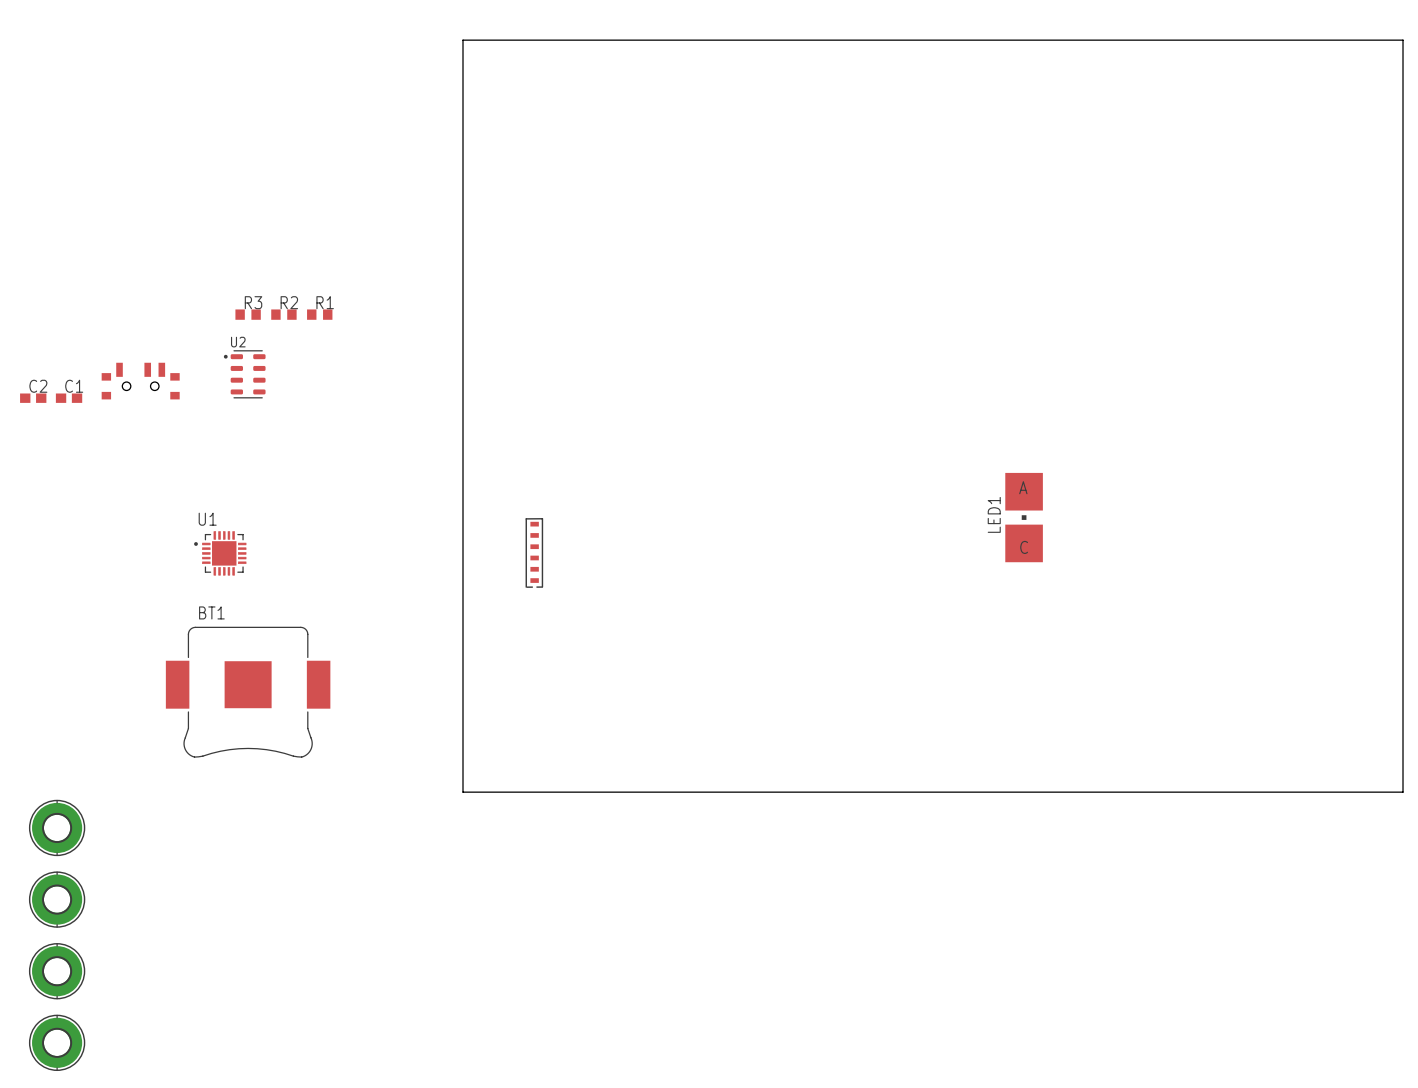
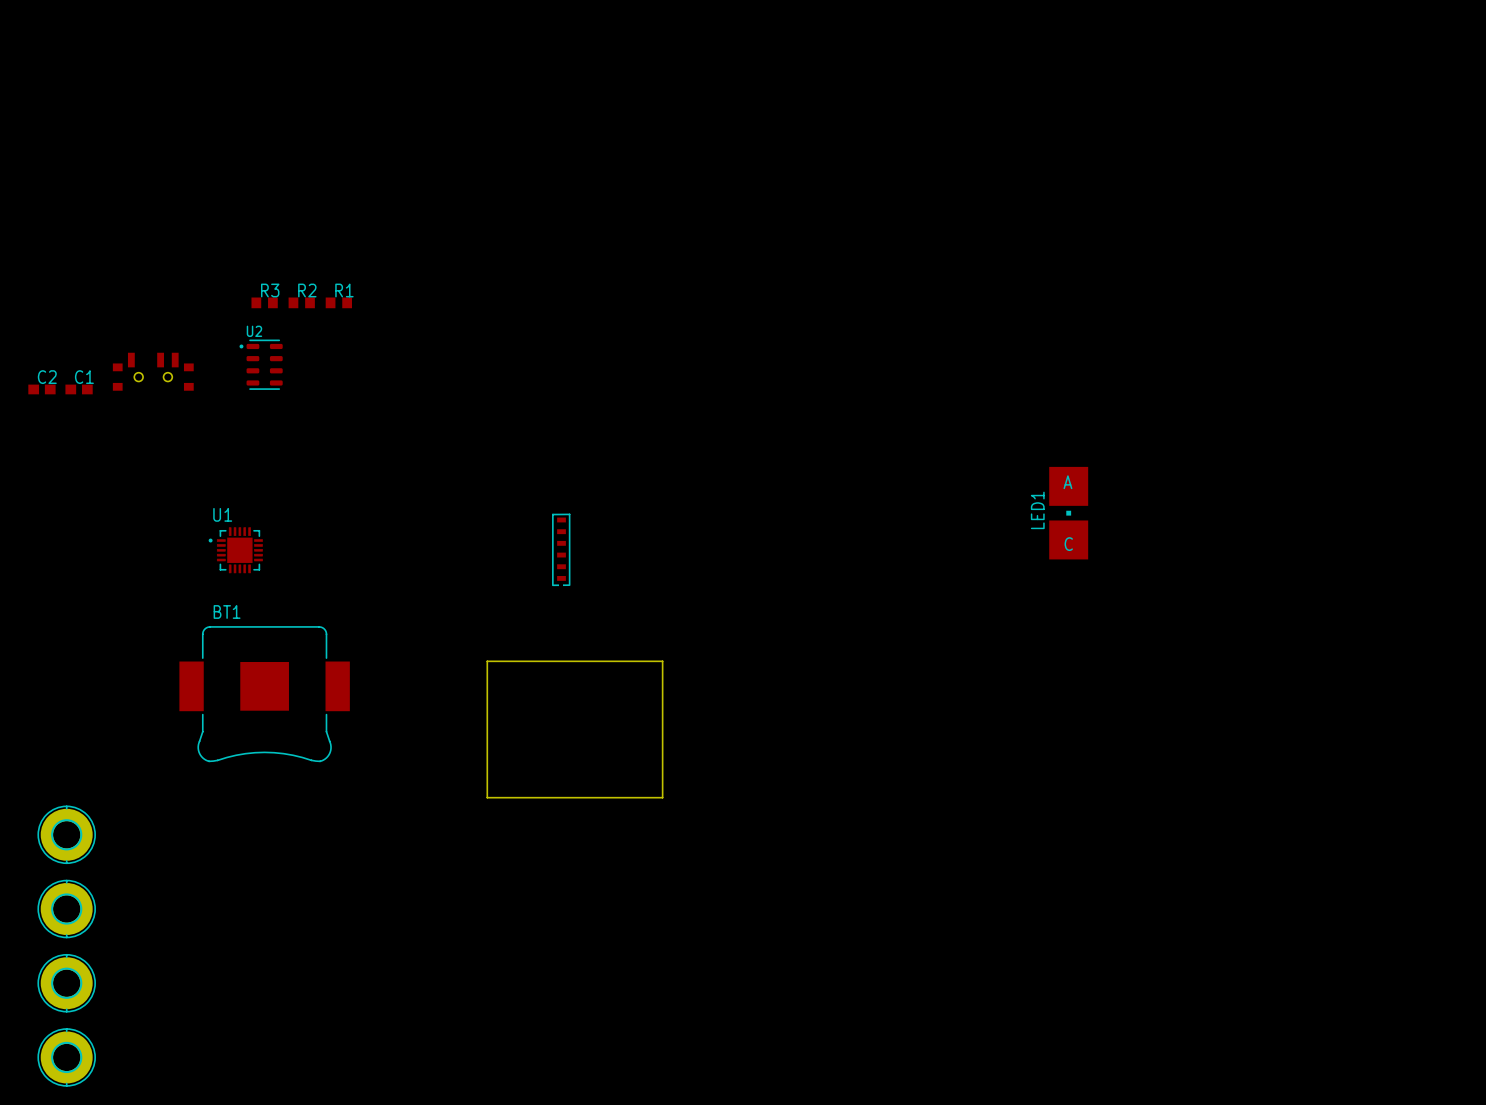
board edge: (463, 660) (463, 40) (1403, 40) (1403, 792) (632, 792) -> (487, 661) (662, 661) (662, 797)

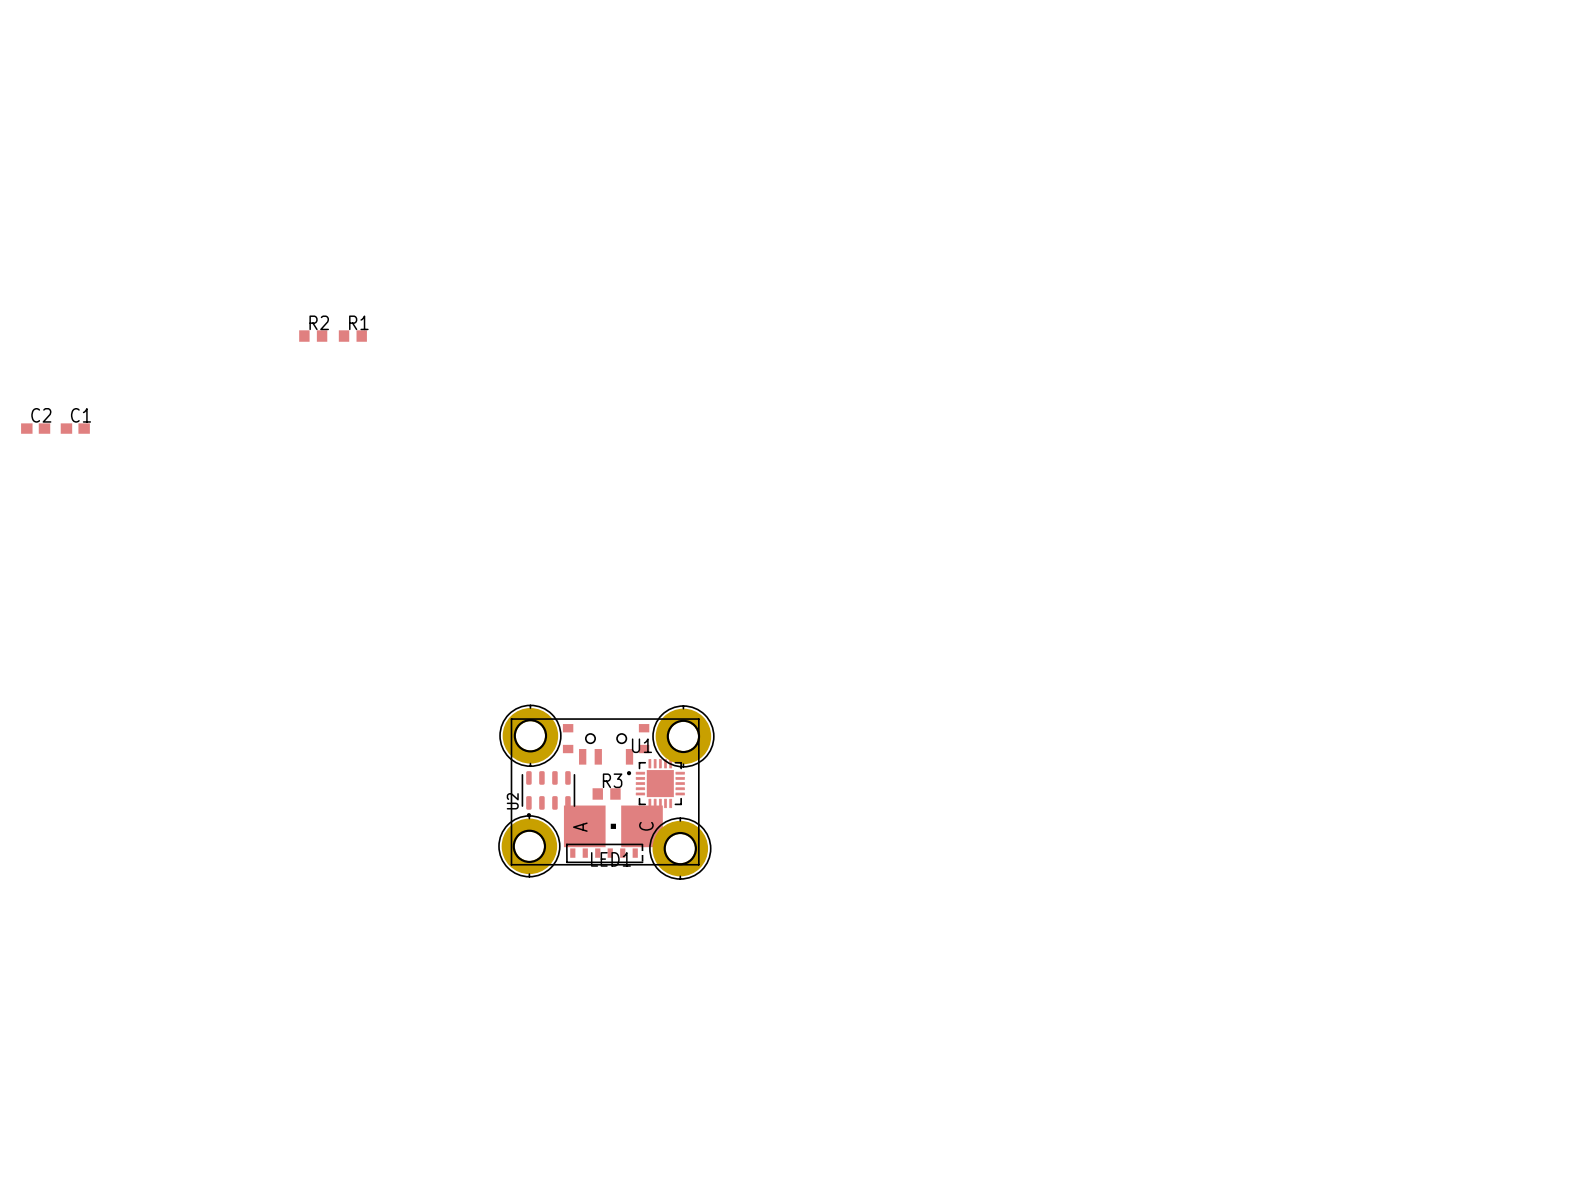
R3 position: (264, 302) -> (606, 793)
U2 rotation: 0° (261, 364) -> 90° counterclockwise (548, 794)
U2 position: (261, 364) -> (548, 794)
part: (153, 371) -> none
LED1 rotation: 0° (1068, 513) -> 90° counterclockwise (613, 826)
LED1 position: (1068, 513) -> (613, 826)
part rotation: 0° (561, 549) -> 90° counterclockwise (604, 853)
part position: (561, 549) -> (604, 853)
U1 position: (235, 550) -> (655, 783)
part: none -> (530, 735)
part: none -> (683, 736)
part: none -> (606, 744)
BT1: (264, 694) -> none
part: none -> (529, 846)
part: none -> (680, 848)
part: (66, 834) -> none
part: (66, 909) -> none
part: (66, 983) -> none
part: (66, 1057) -> none

